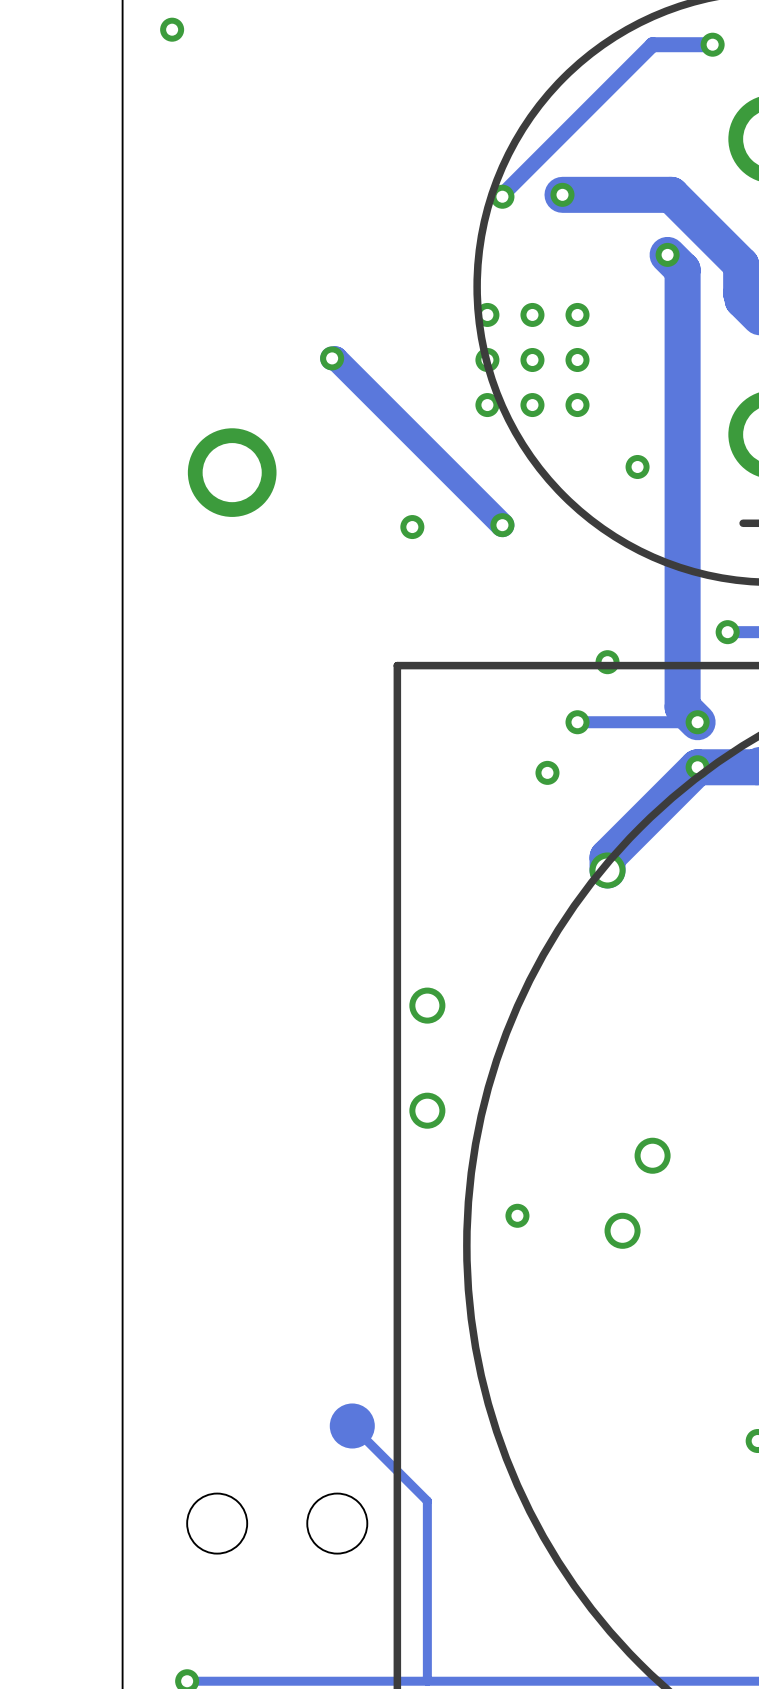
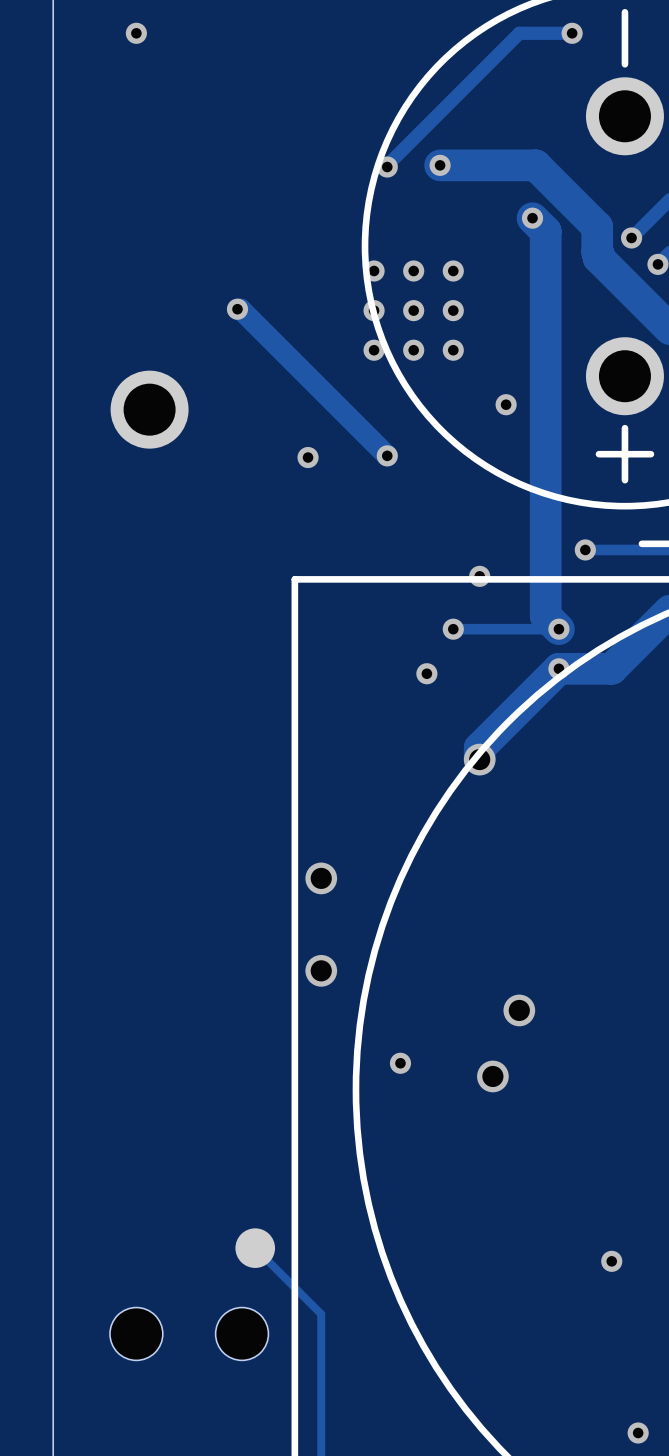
via position: (172, 29) -> (136, 33)

